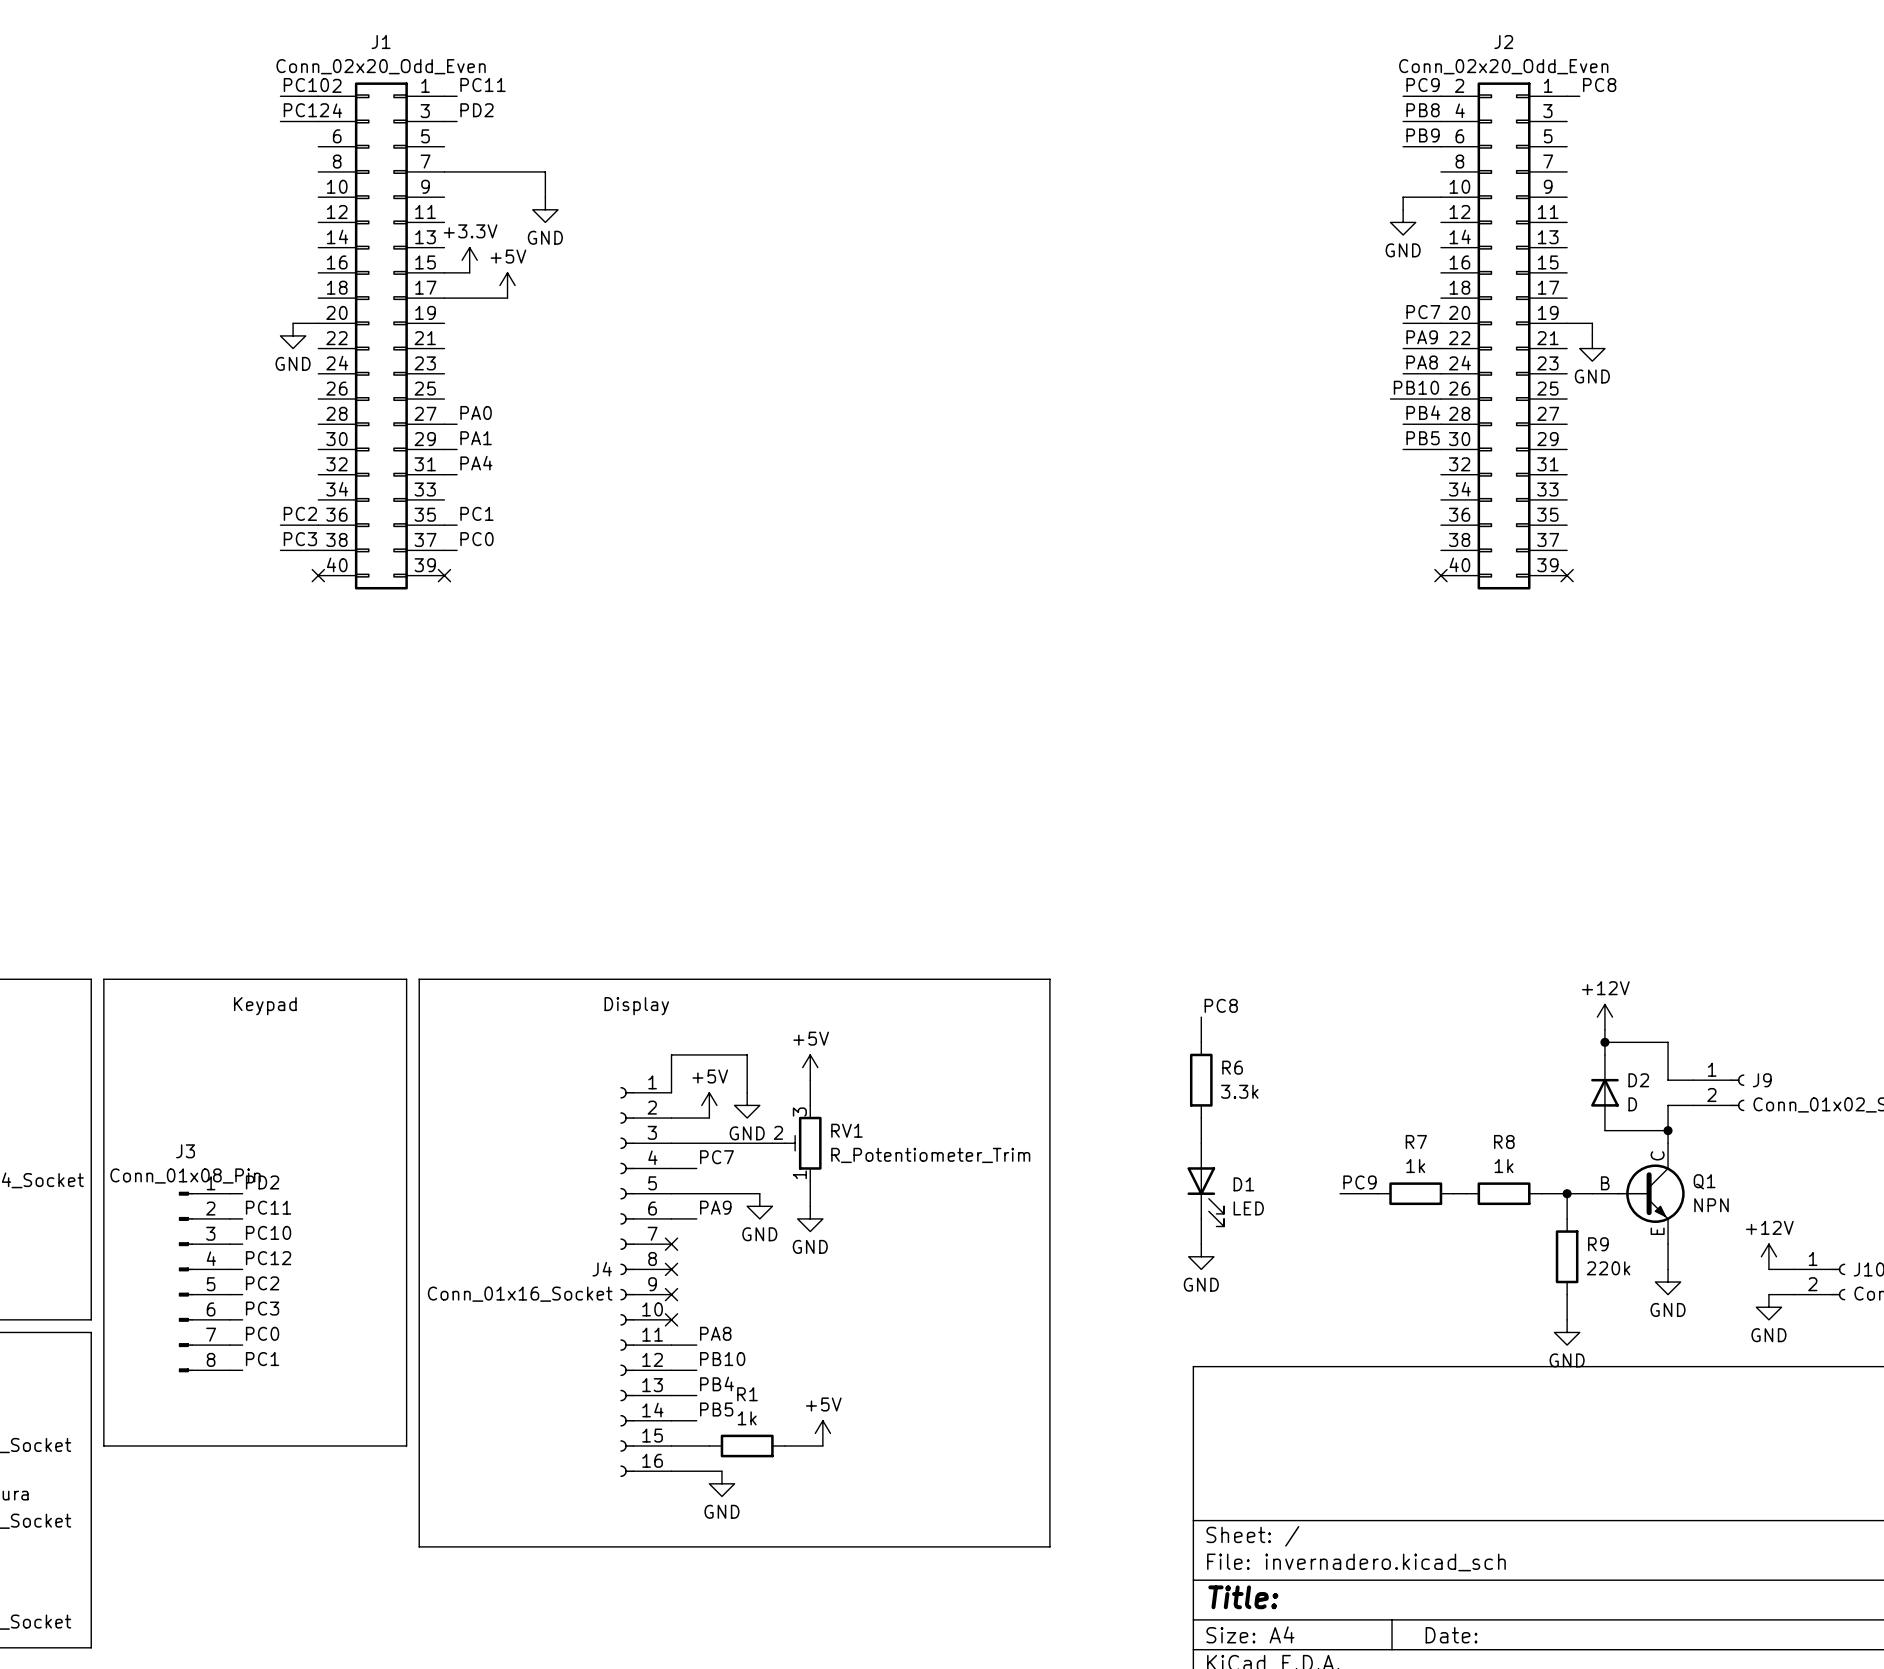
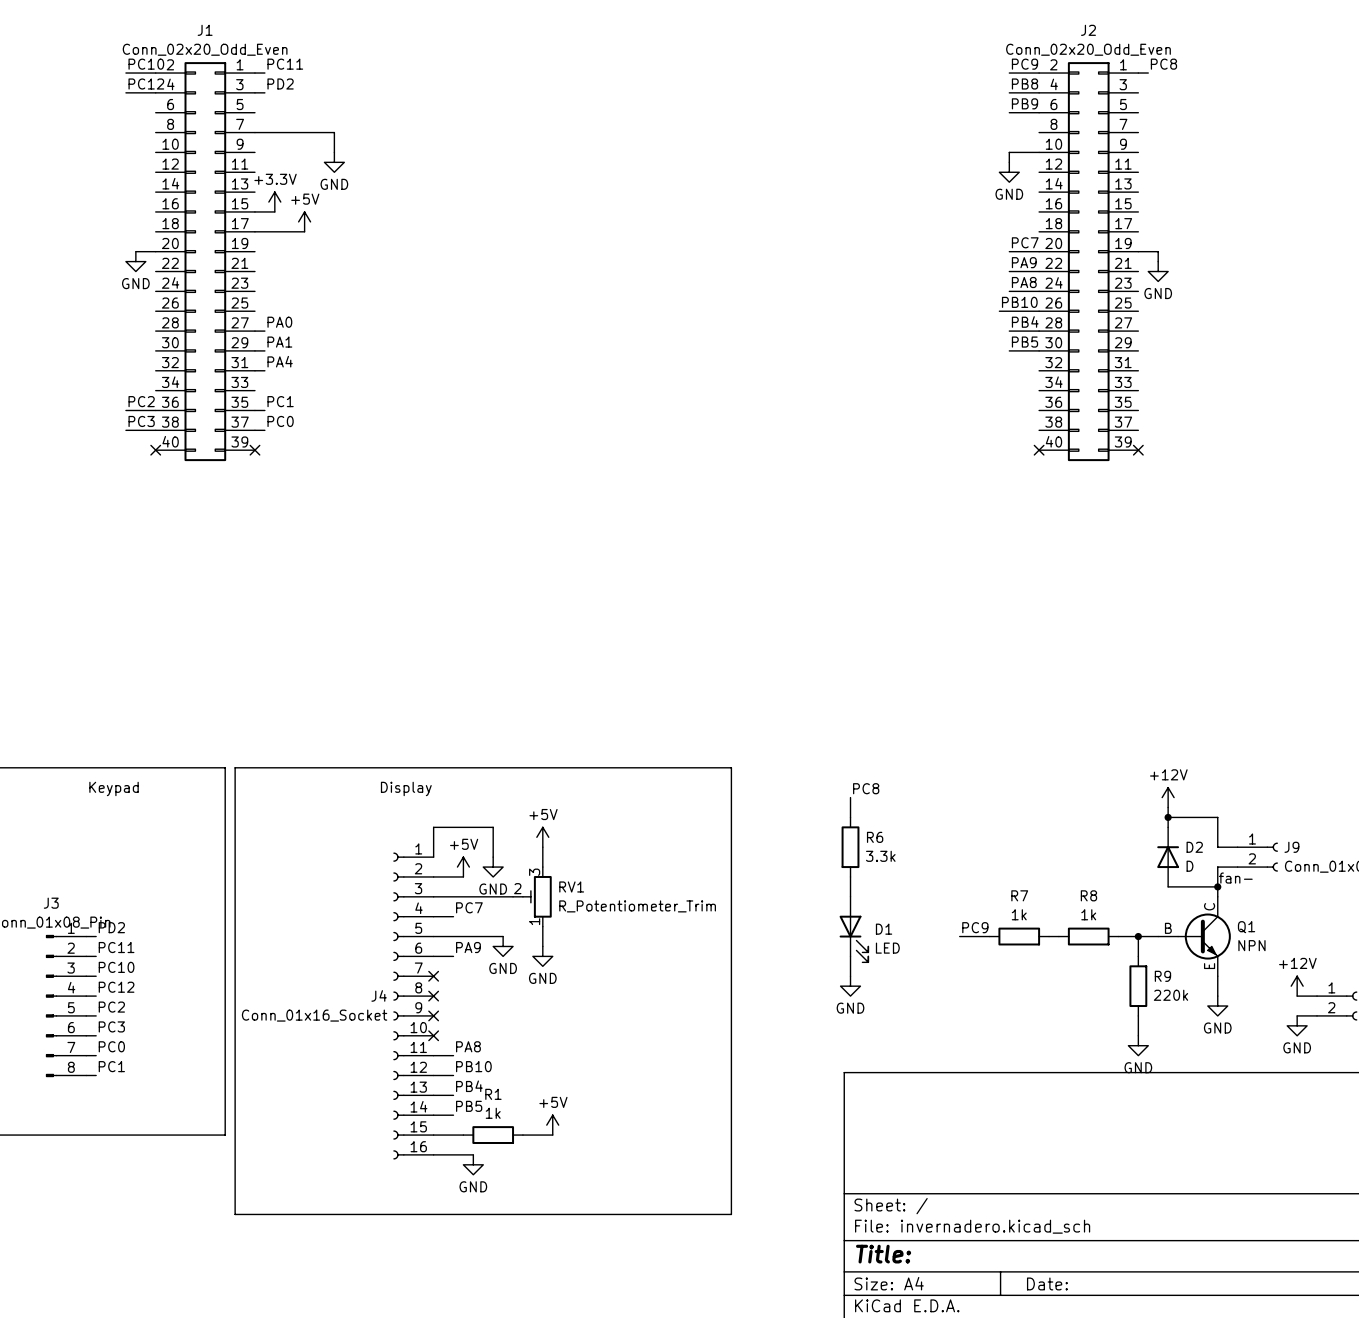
label: none -> fan- (1235, 878)

